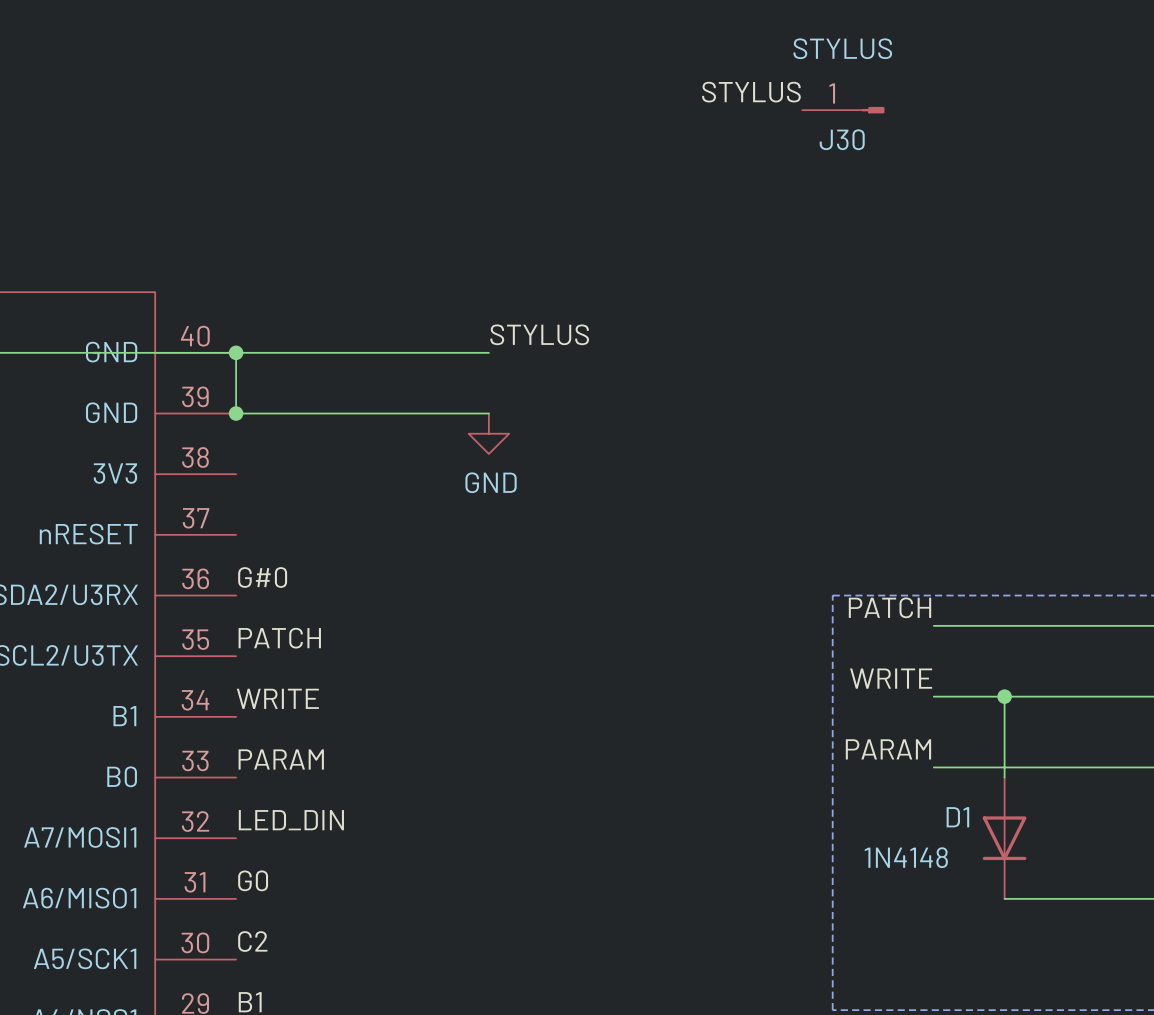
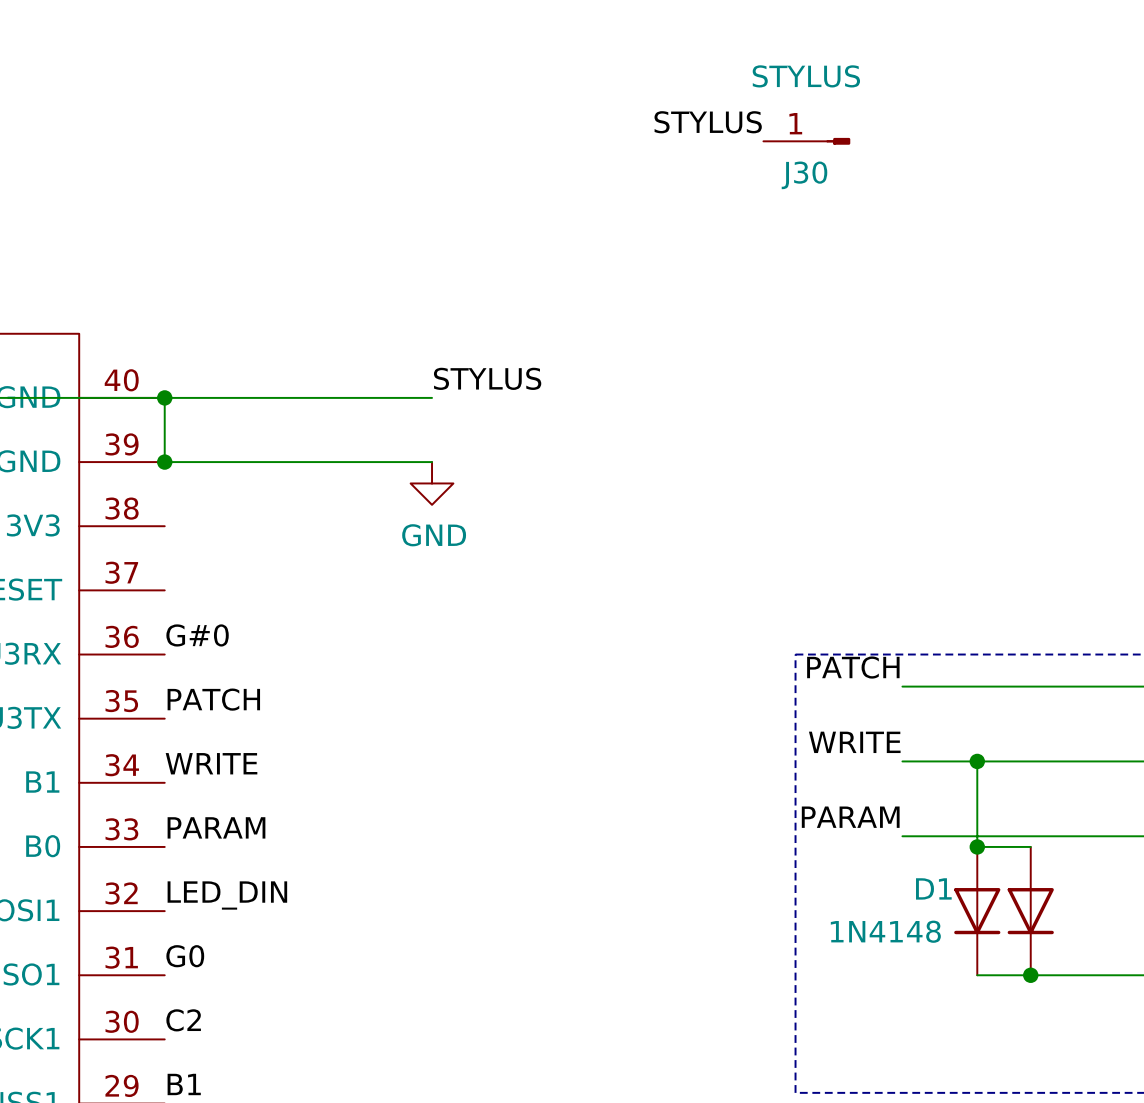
wire: none -> (977, 846) (1030, 846)
junction: none -> (977, 846)
part: none -> (1030, 911)
junction: none -> (1030, 975)

